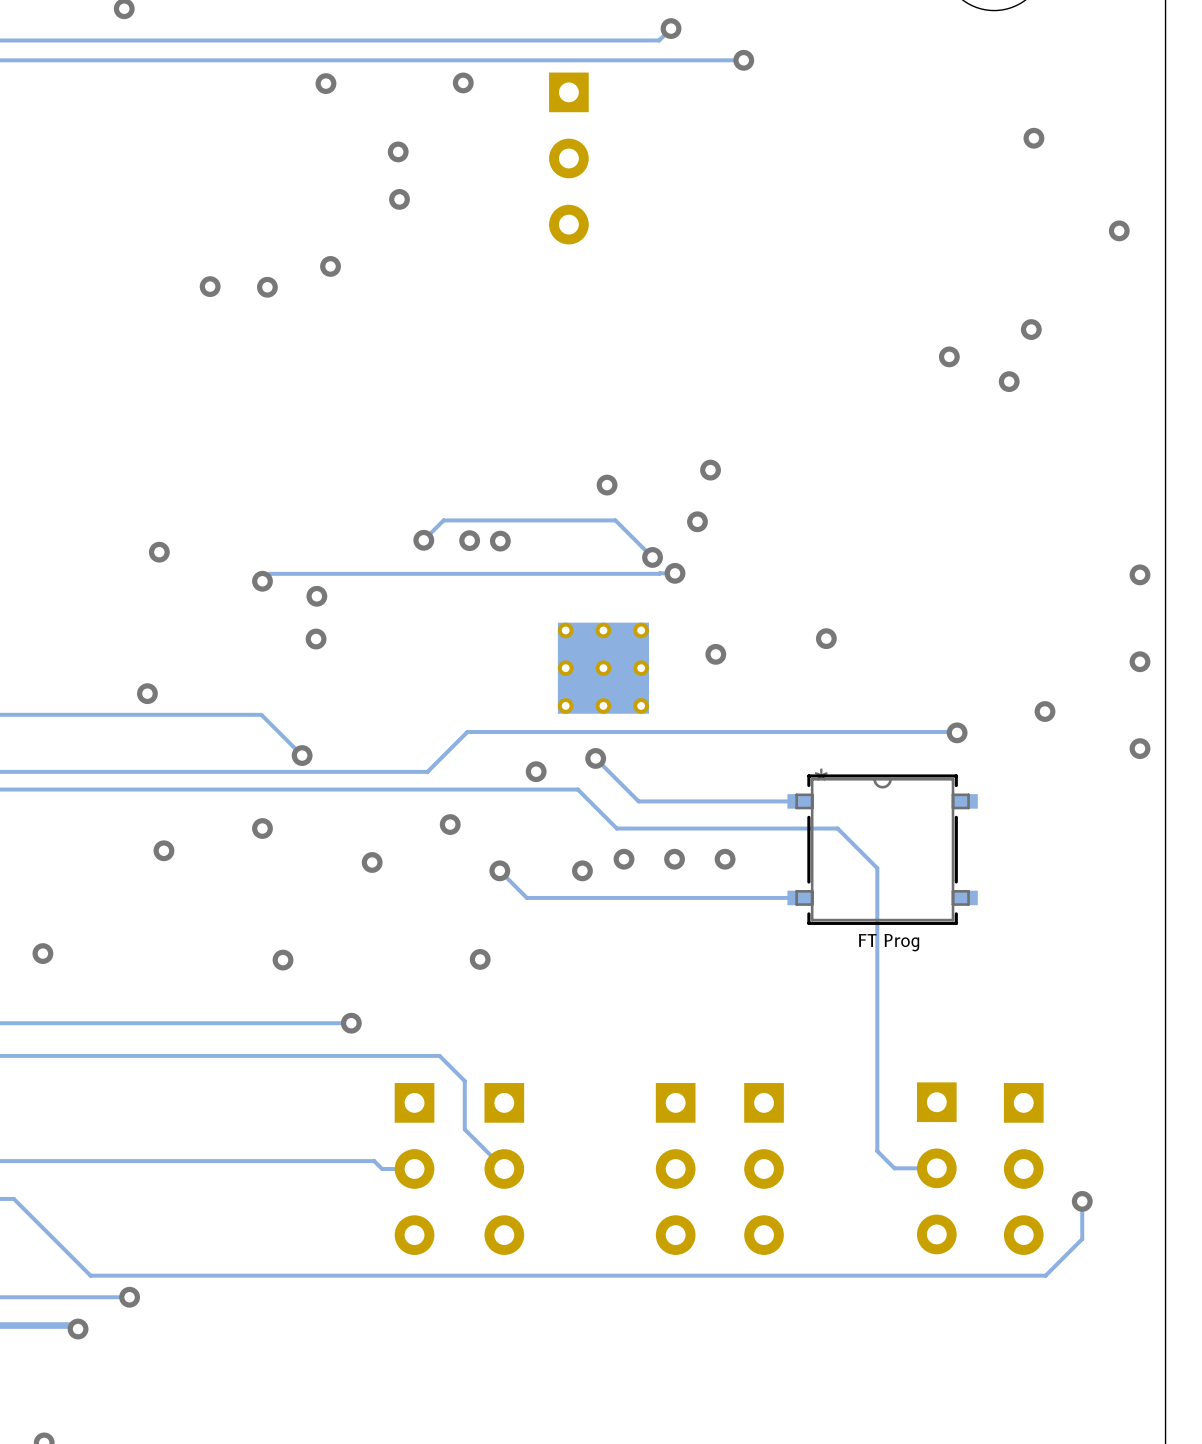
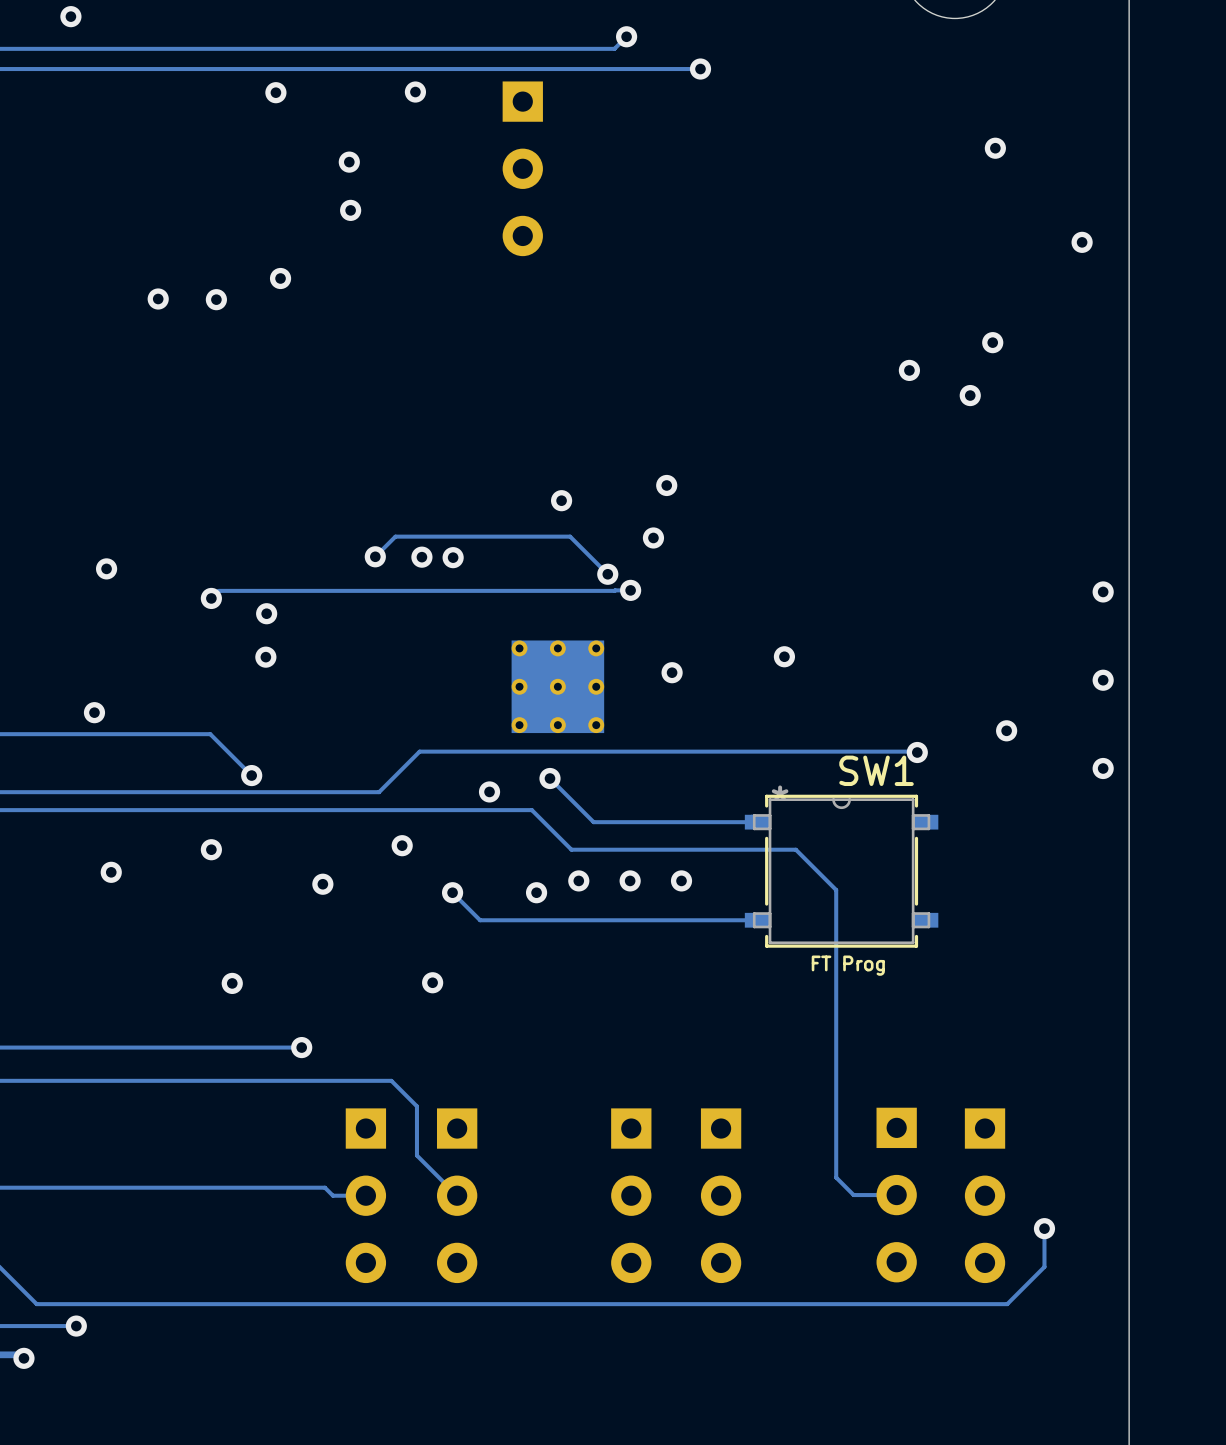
SW1 name: none -> SW1 (876, 770)

